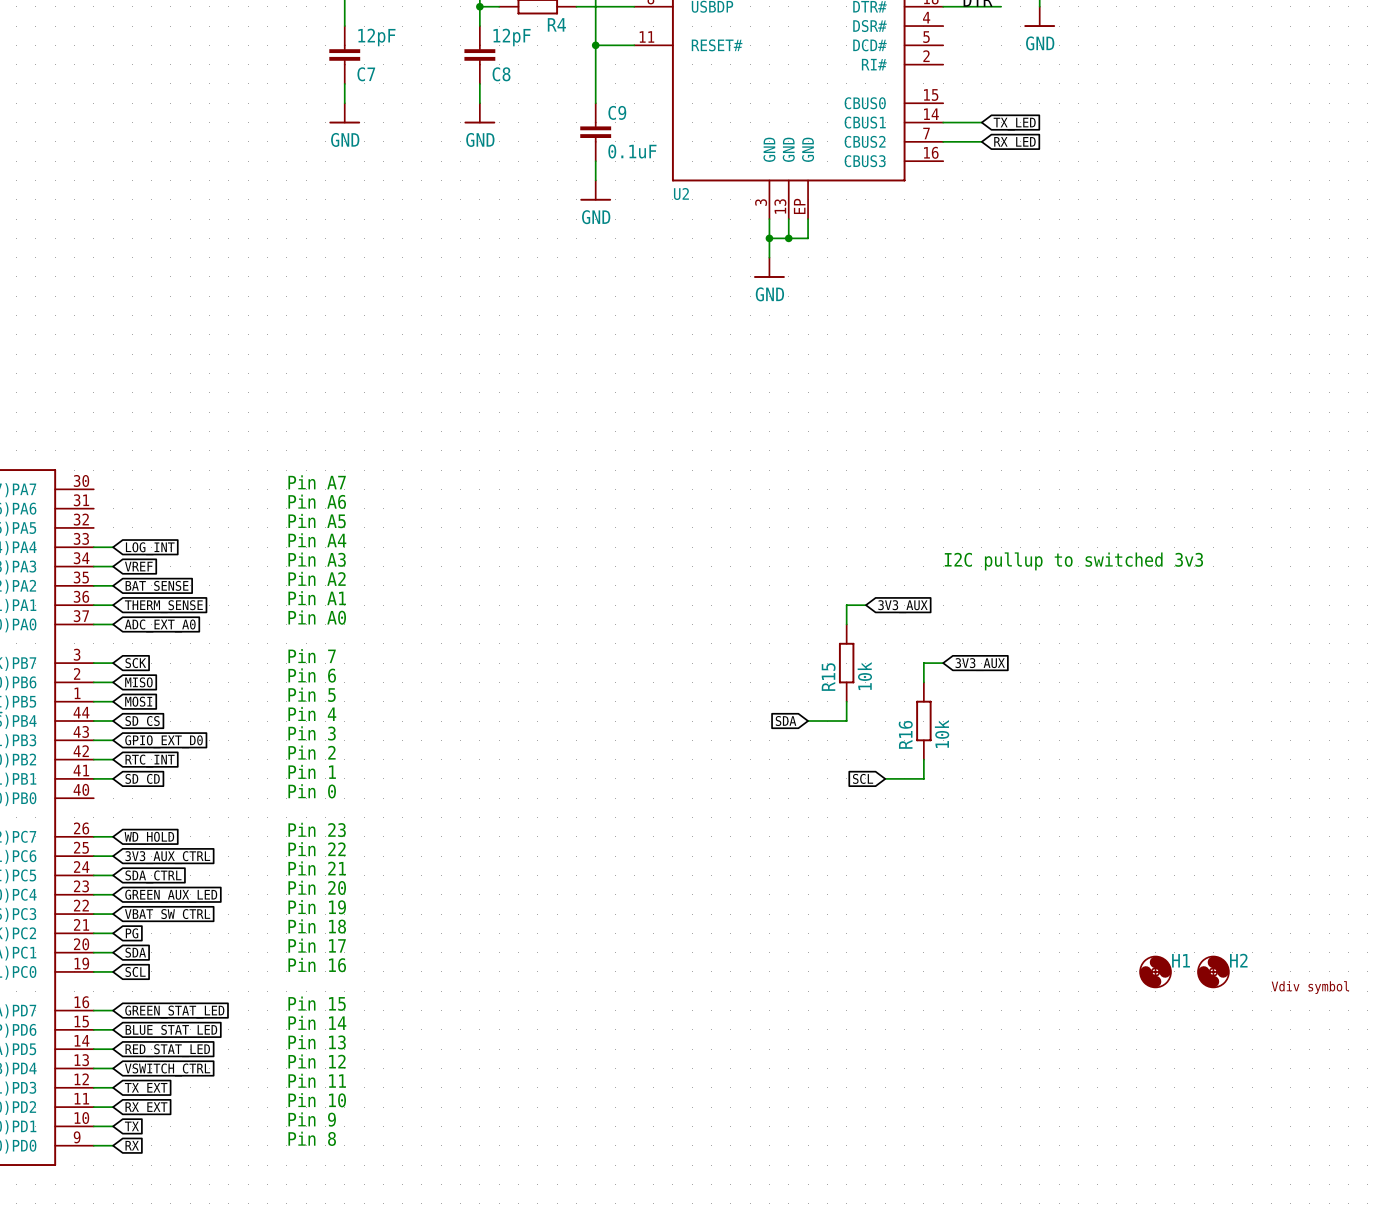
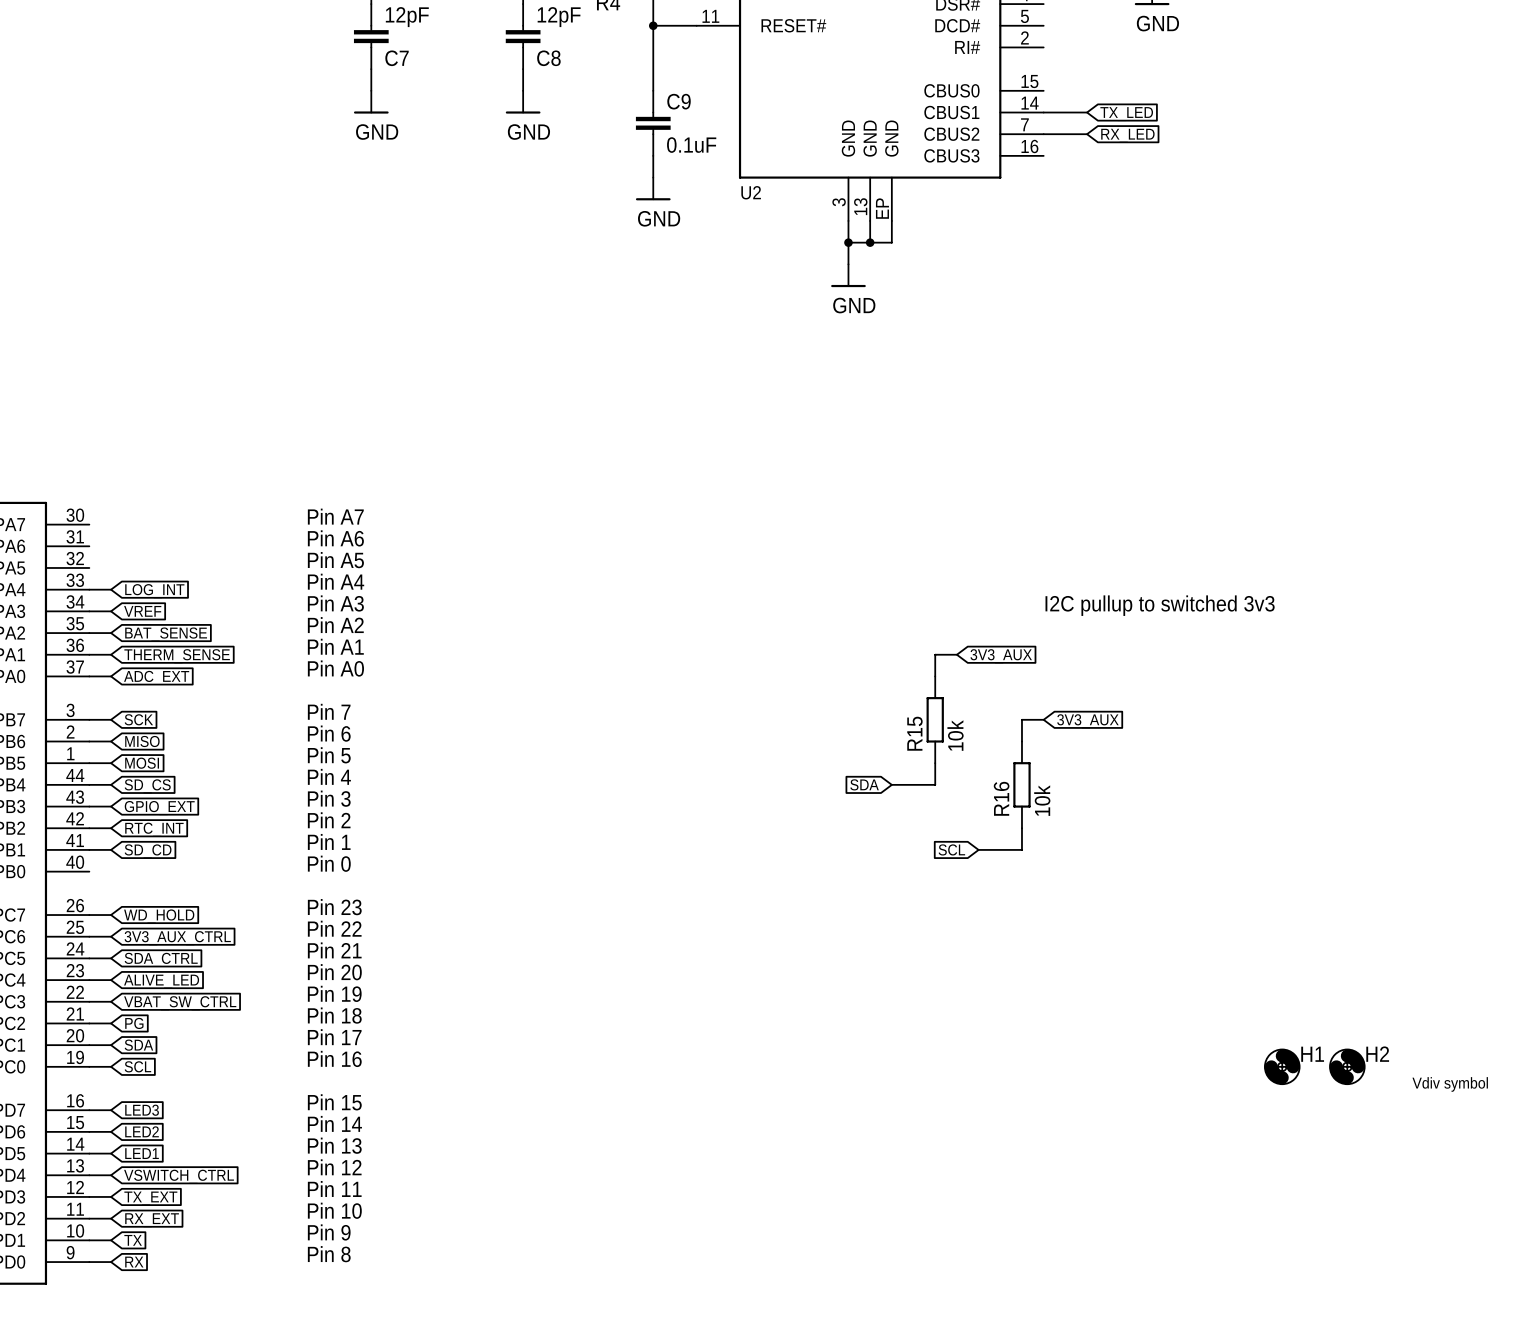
global label: ADC_EXT_A0 (160, 625) -> ADC_EXT (156, 677)
global label: GPIO_EXT_D0 (164, 741) -> GPIO_EXT (159, 808)
global label: GREEN_AUX_LED (171, 896) -> ALIVE_LED (161, 981)
global label: GREEN_STAT_LED (174, 1012) -> LED3 (142, 1110)
global label: BLUE_STAT_LED (171, 1031) -> LED2 (142, 1131)
global label: RED_STAT_LED (167, 1050) -> LED1 (142, 1153)

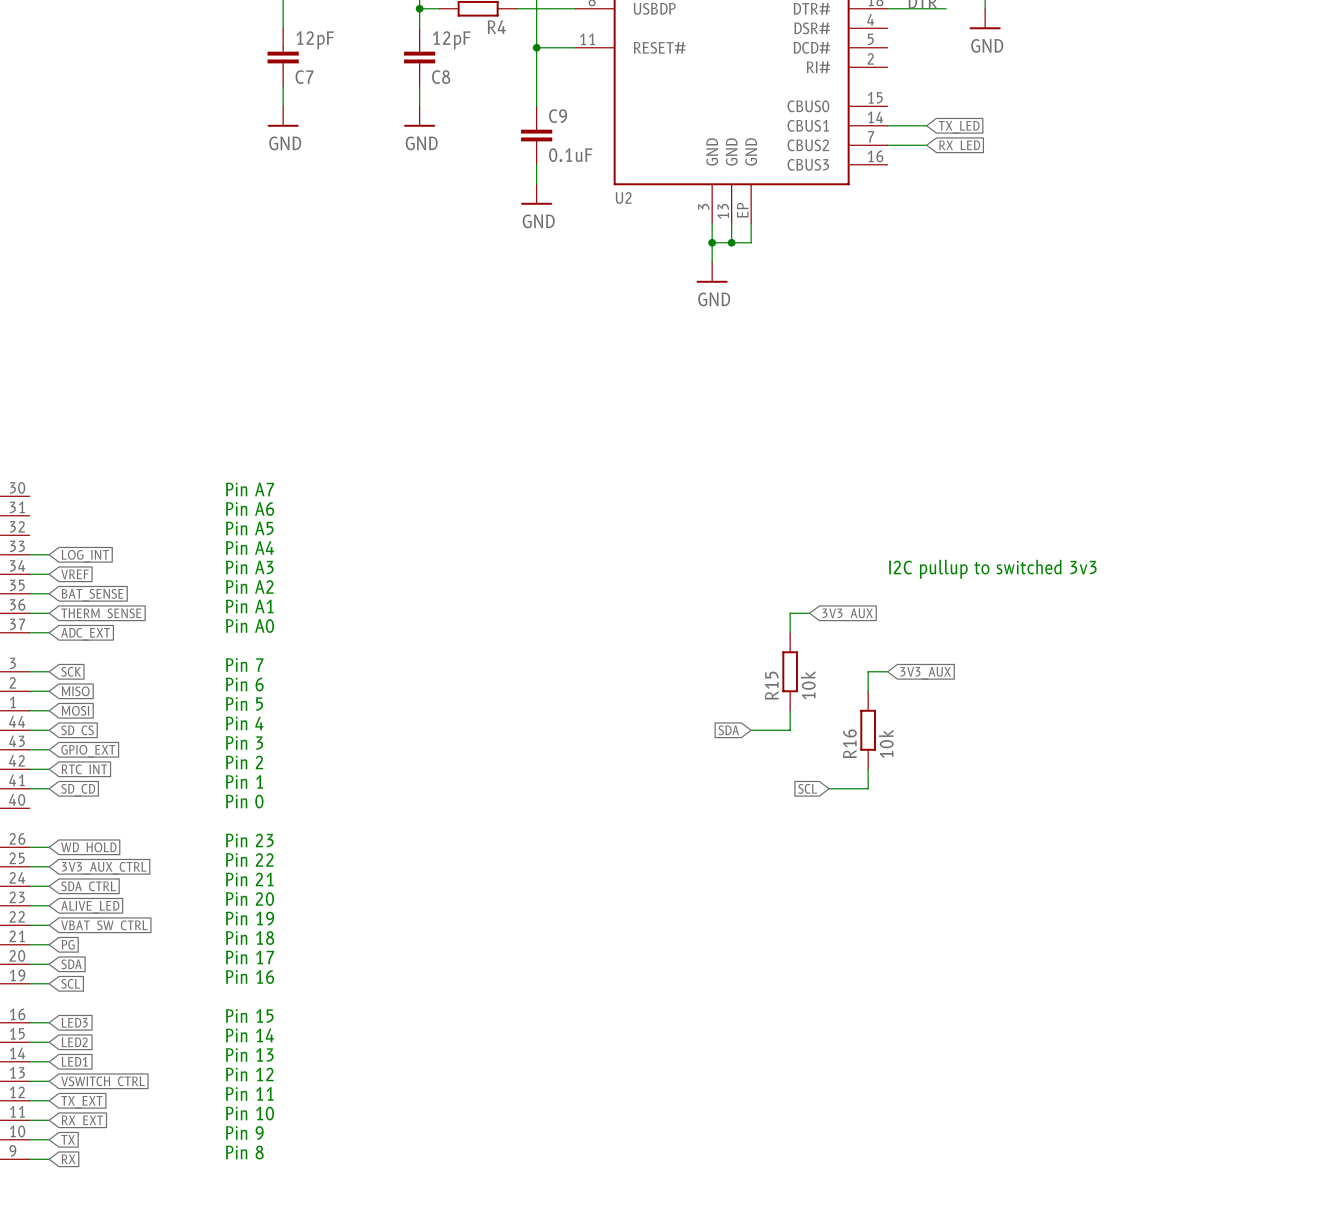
H1: (1282, 1066) -> none
H2: (1347, 1066) -> none
part: (1450, 1084) -> none

